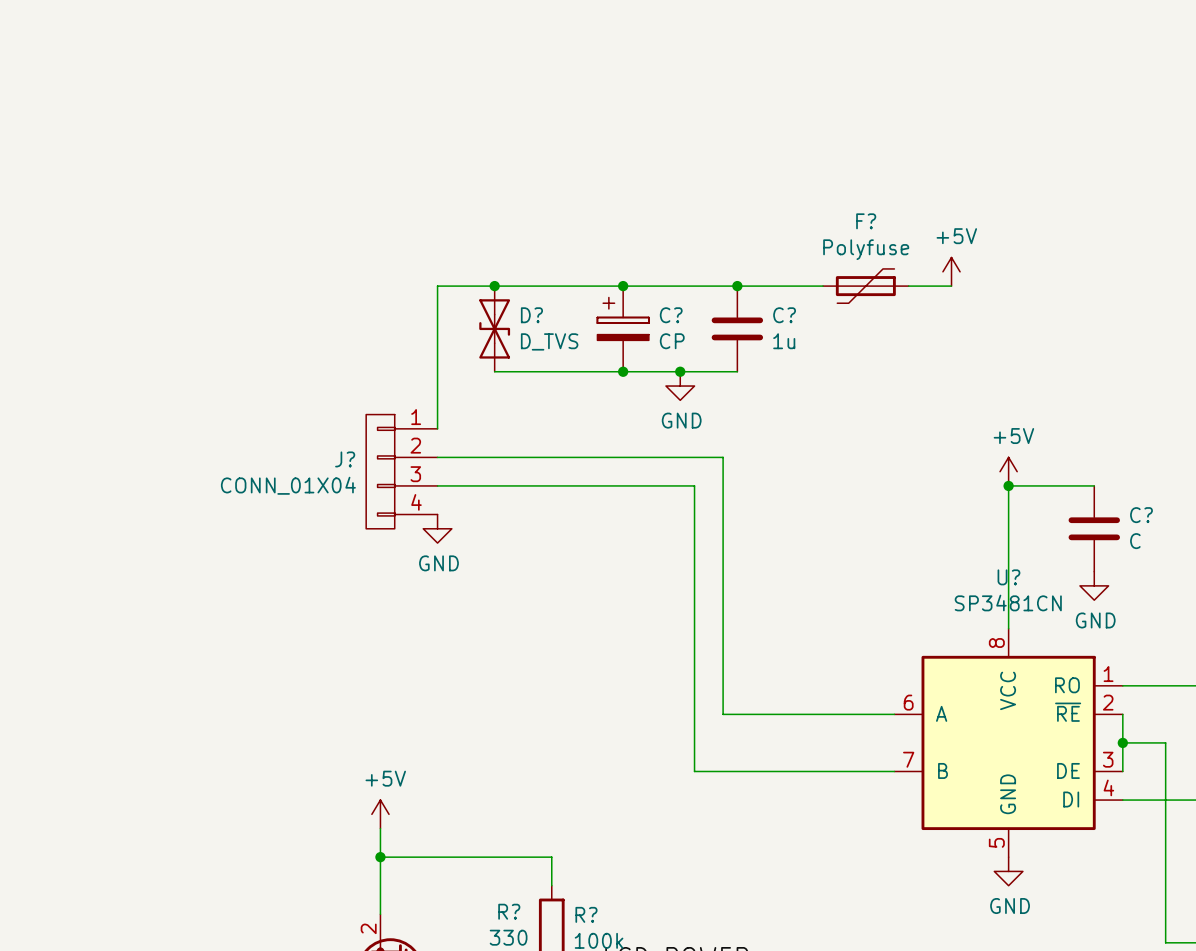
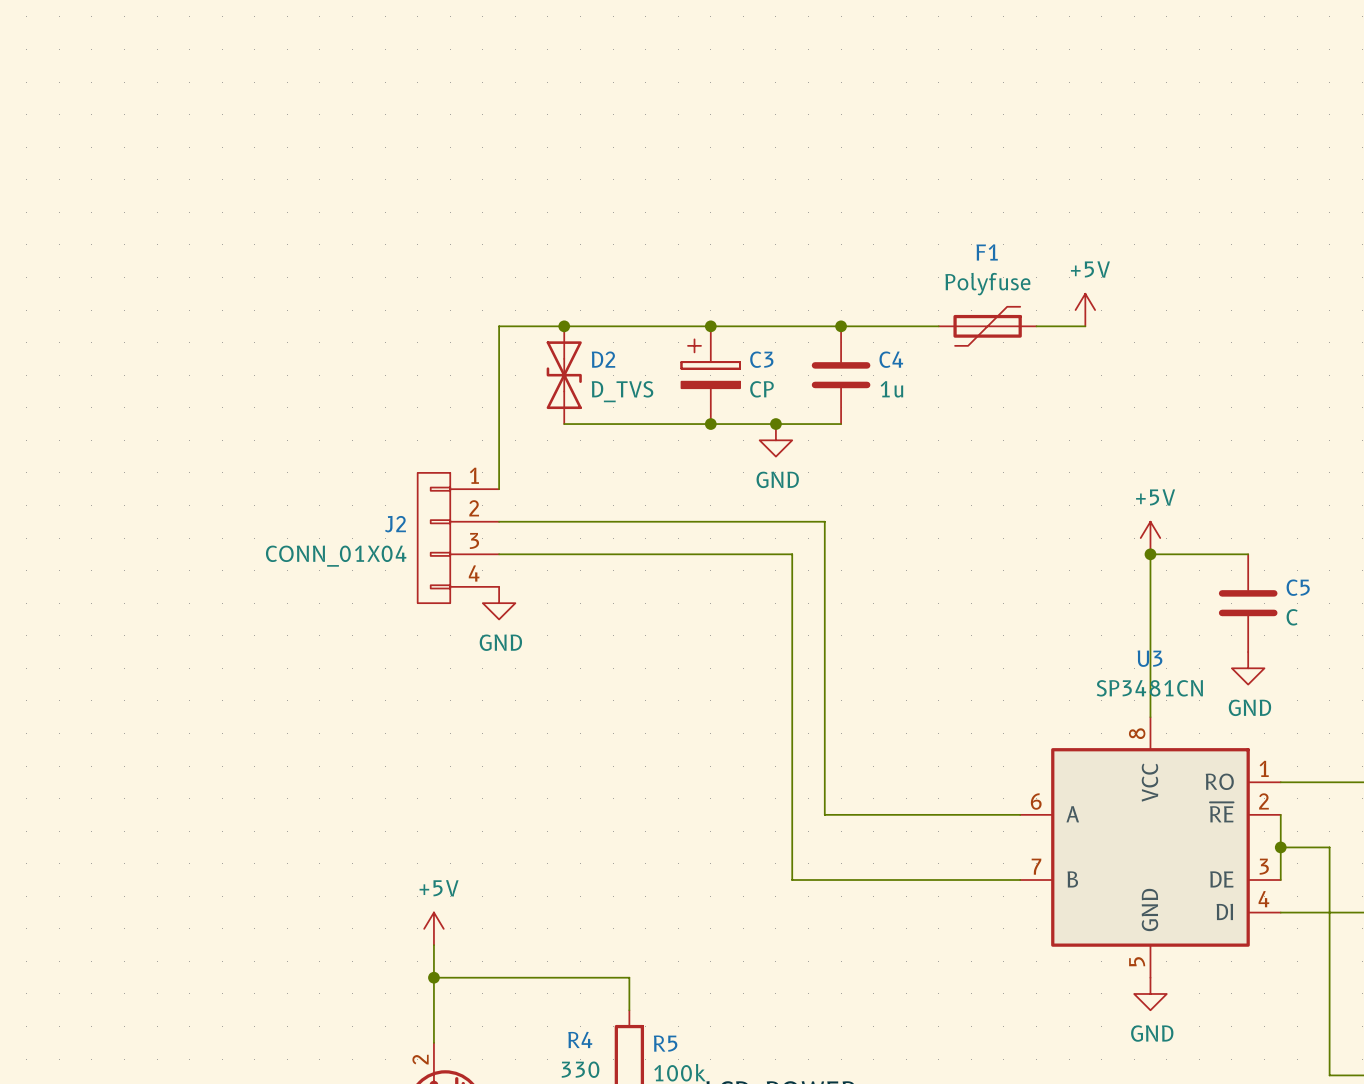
F? name: F? (866, 221) -> F1 (987, 252)
D? name: D? (531, 315) -> D2 (603, 359)
C? name: C? (671, 315) -> C3 (761, 359)
C? name: C? (784, 315) -> C4 (891, 359)
J? name: J? (345, 459) -> J2 (395, 524)
C? name: C? (1141, 515) -> C5 (1298, 587)
U? name: U? (1008, 577) -> U3 (1149, 658)
R? name: R? (509, 911) -> R4 (580, 1039)
R? name: R? (586, 914) -> R5 (665, 1043)

